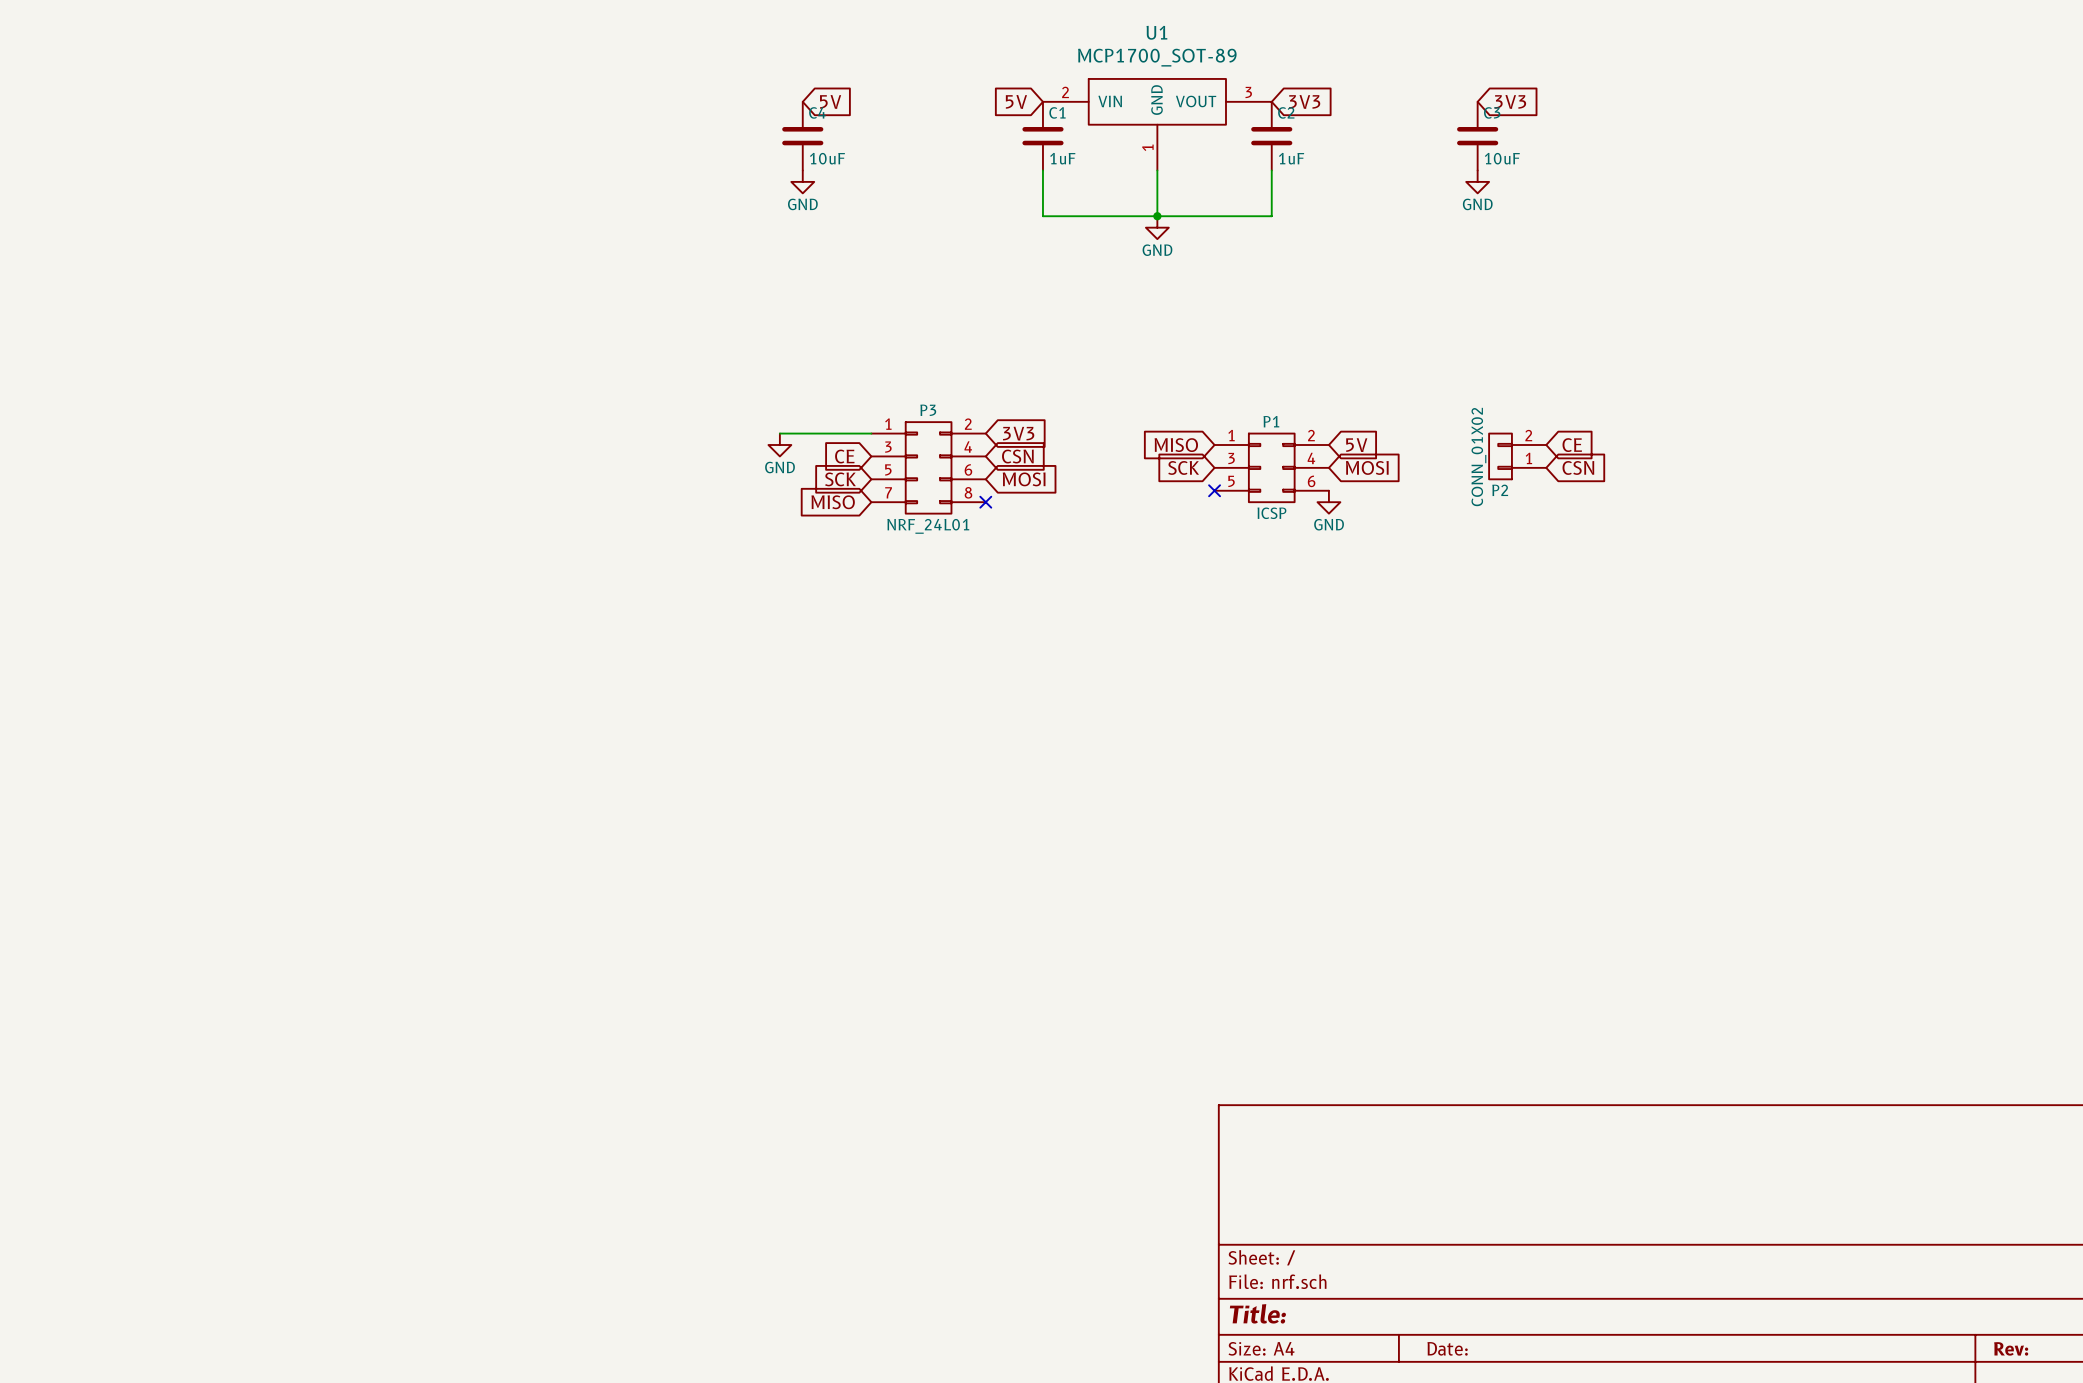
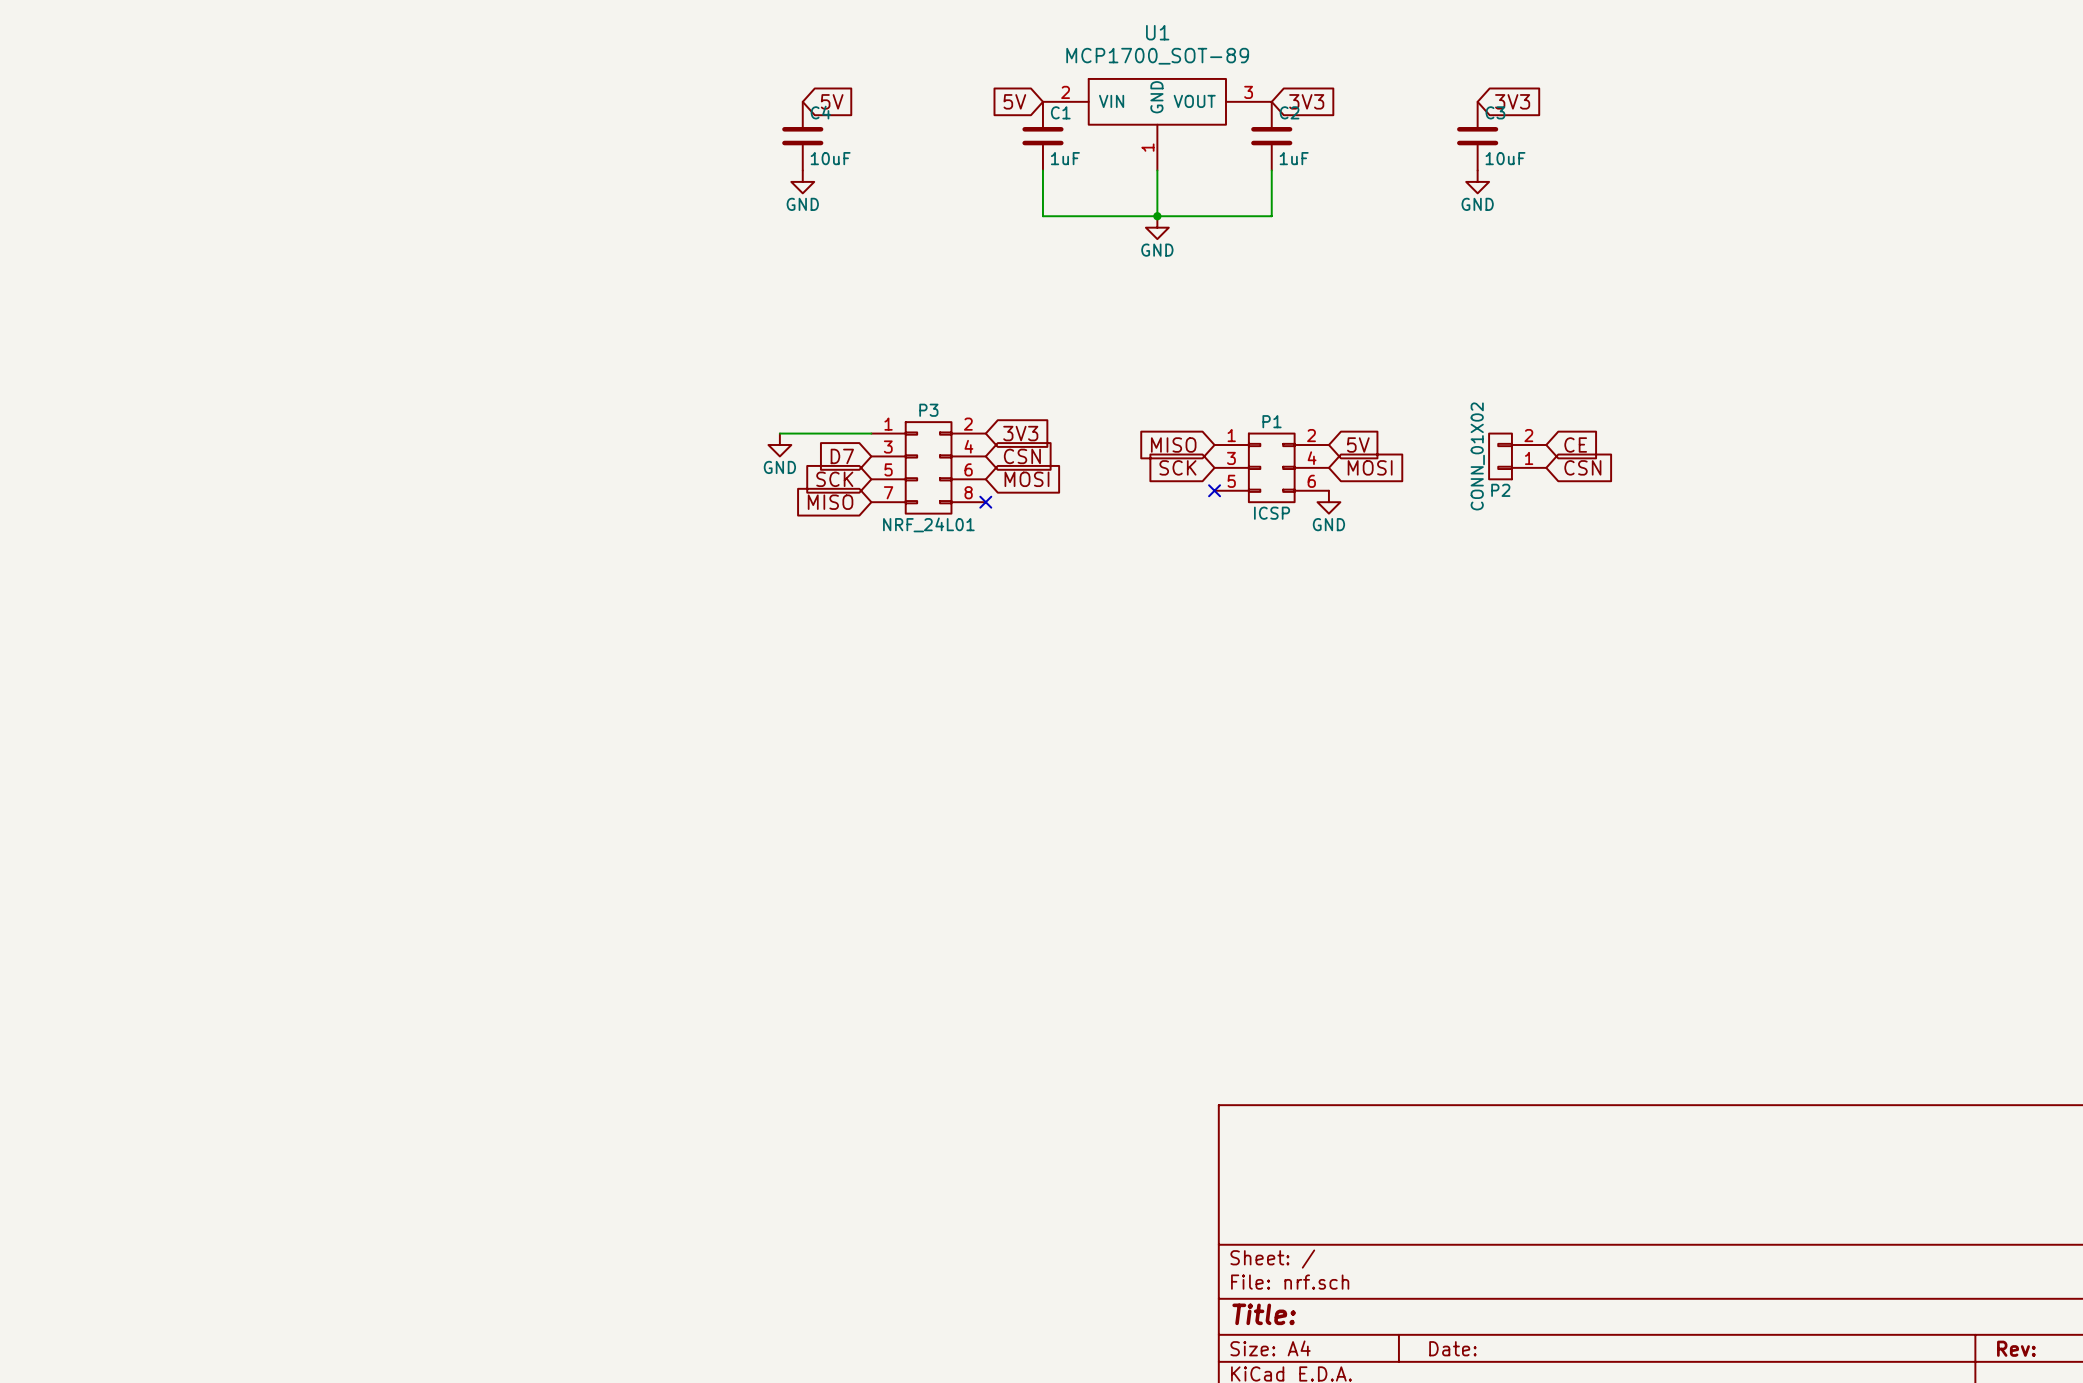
global label: CE (844, 456) -> D7 (842, 456)

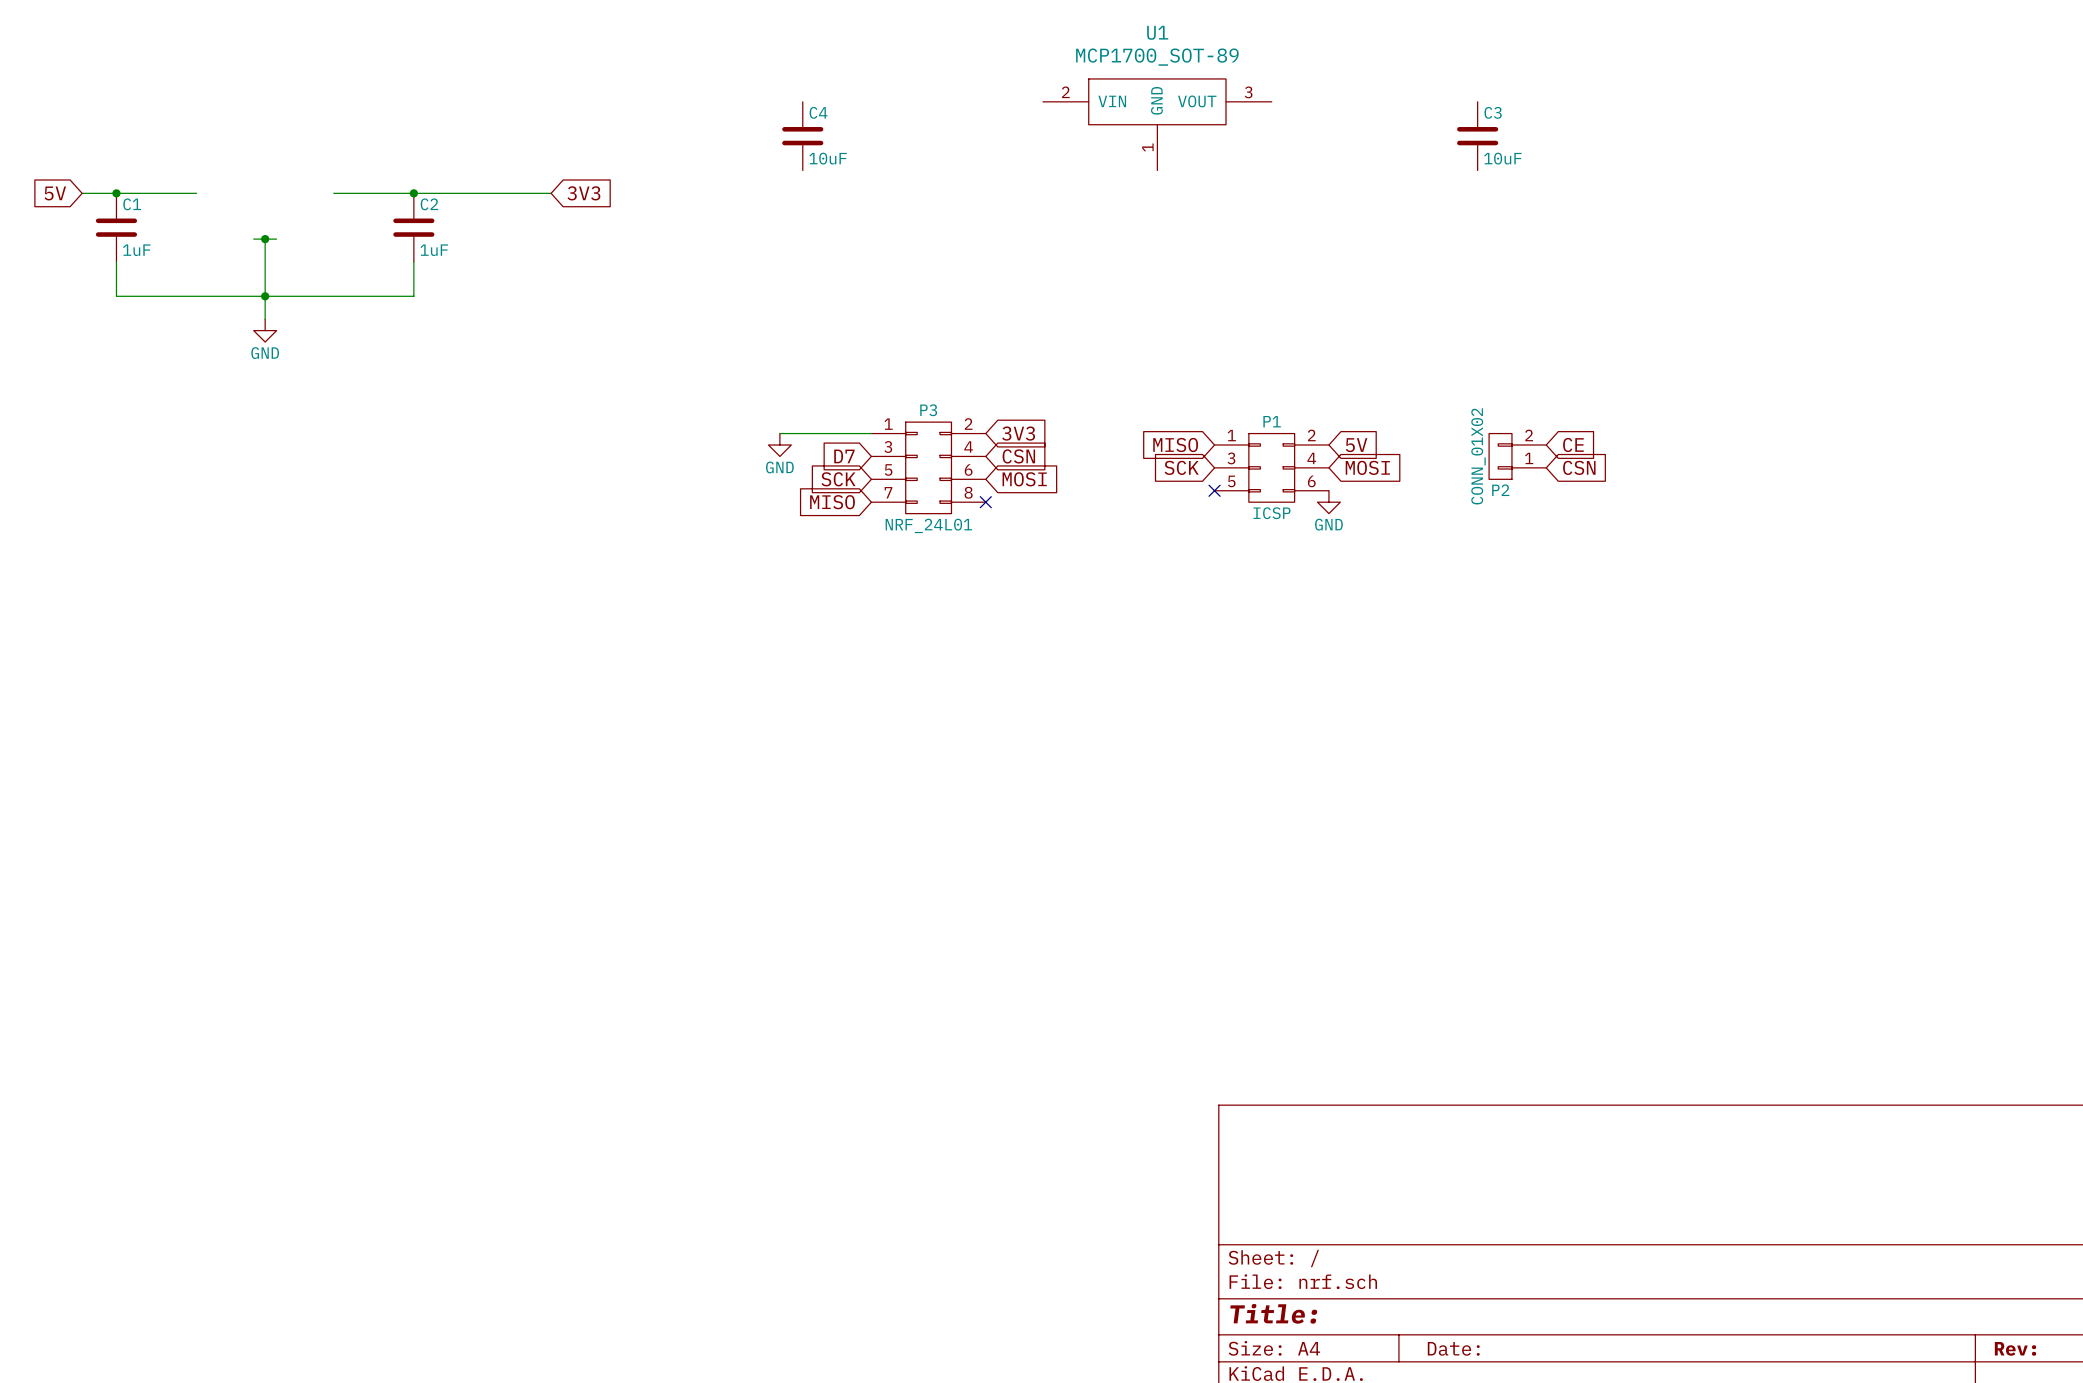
global label: 5V (832, 101) -> none
global label: 5V (1014, 101) -> none
global label: 3V3 (1306, 101) -> none
global label: 3V3 (1512, 101) -> none
C1 position: (1042, 136) -> (116, 227)
C2 position: (1271, 136) -> (413, 227)
wire: (1042, 170) (1042, 216) (1271, 216) (1271, 170) -> none
wire: (1157, 170) (1157, 216) -> none
power symbol: GND (802, 181) -> none
power symbol: GND (1477, 181) -> none
global label: none -> 5V (55, 193)
wire: none -> (82, 193) (196, 193)
junction: none -> (116, 193)
wire: none -> (333, 193) (551, 193)
junction: none -> (413, 193)
global label: none -> 3V3 (583, 193)
junction: (1157, 216) -> none
power symbol: GND (1157, 227) -> none
wire: none -> (253, 239) (276, 239)
wire: none -> (265, 239) (265, 319)
junction: none -> (265, 239)
wire: none -> (116, 261) (116, 296) (413, 296) (413, 261)
junction: none -> (265, 296)
power symbol: none -> GND (265, 330)

